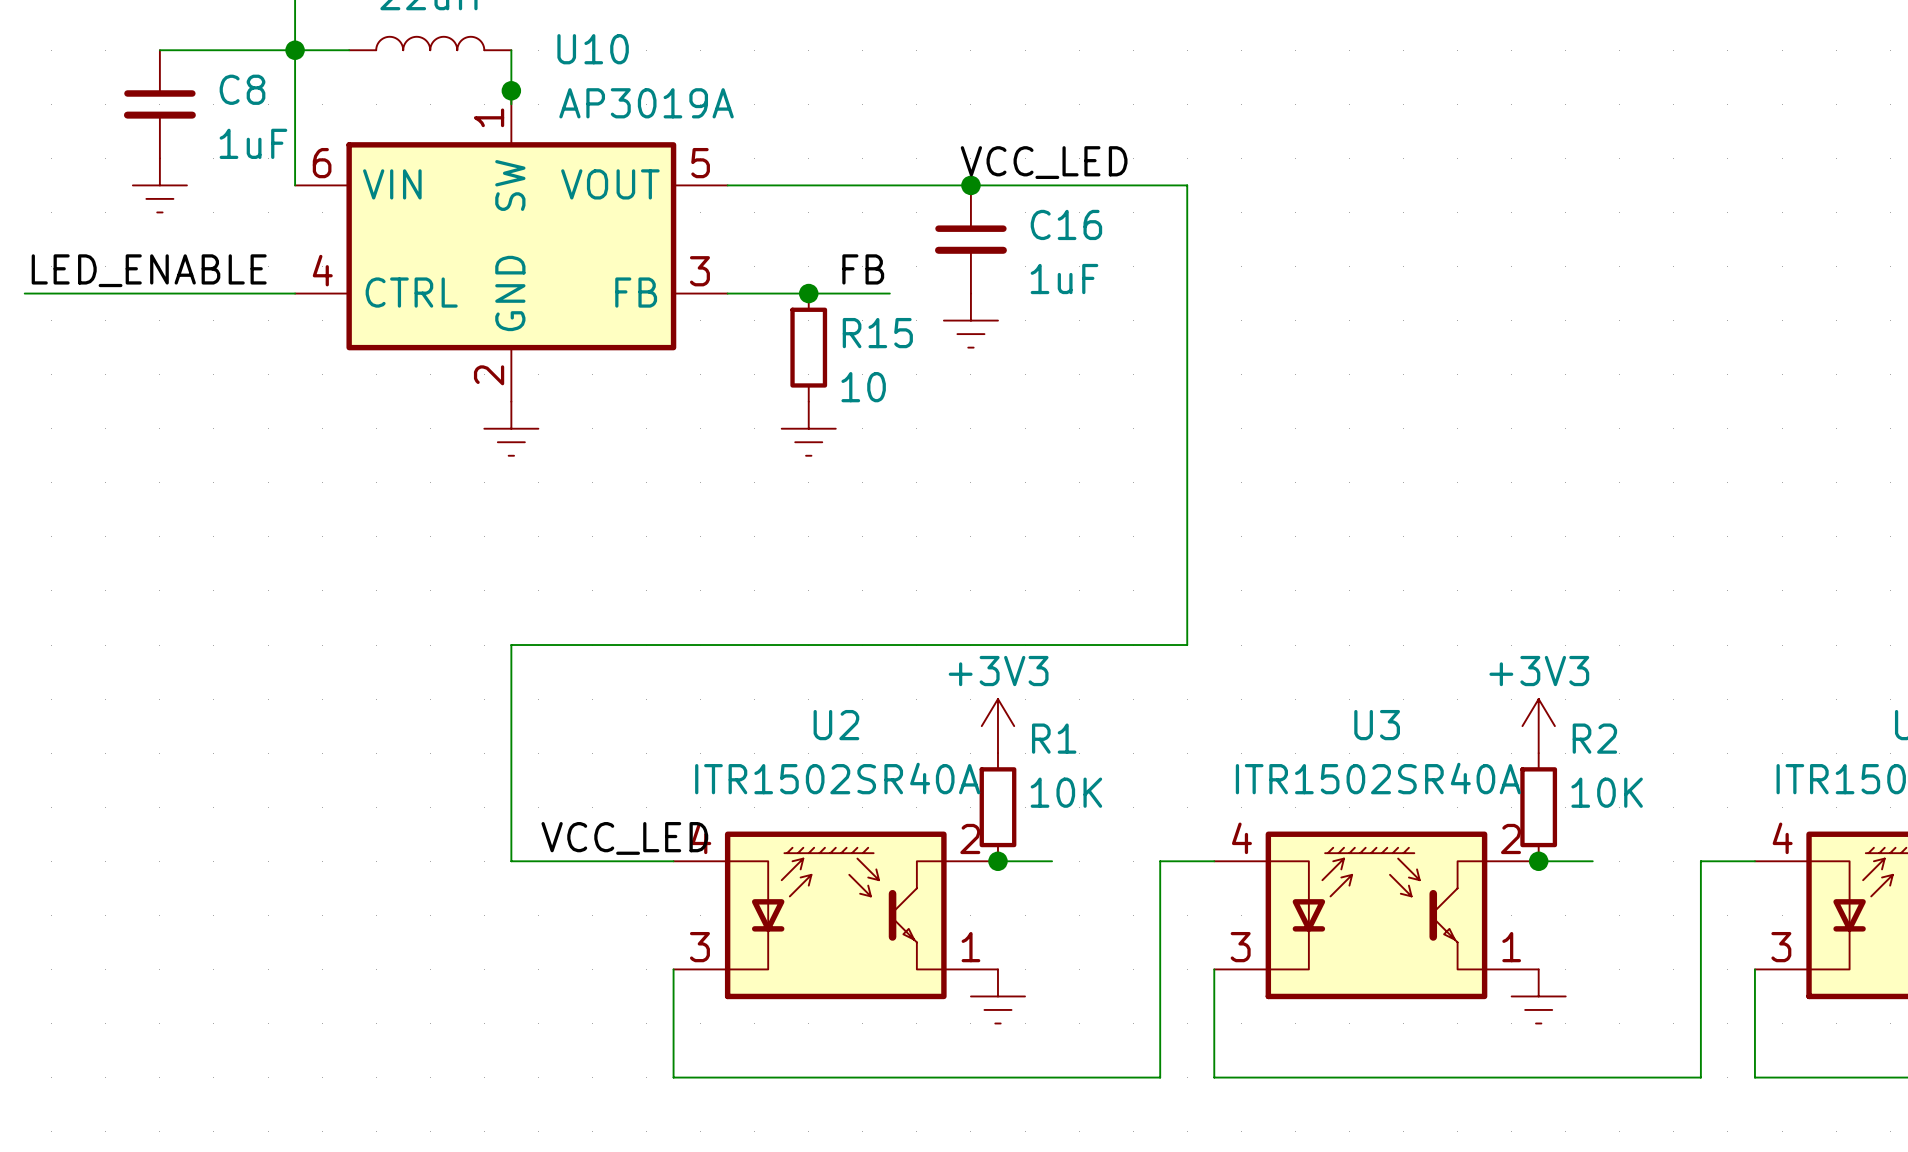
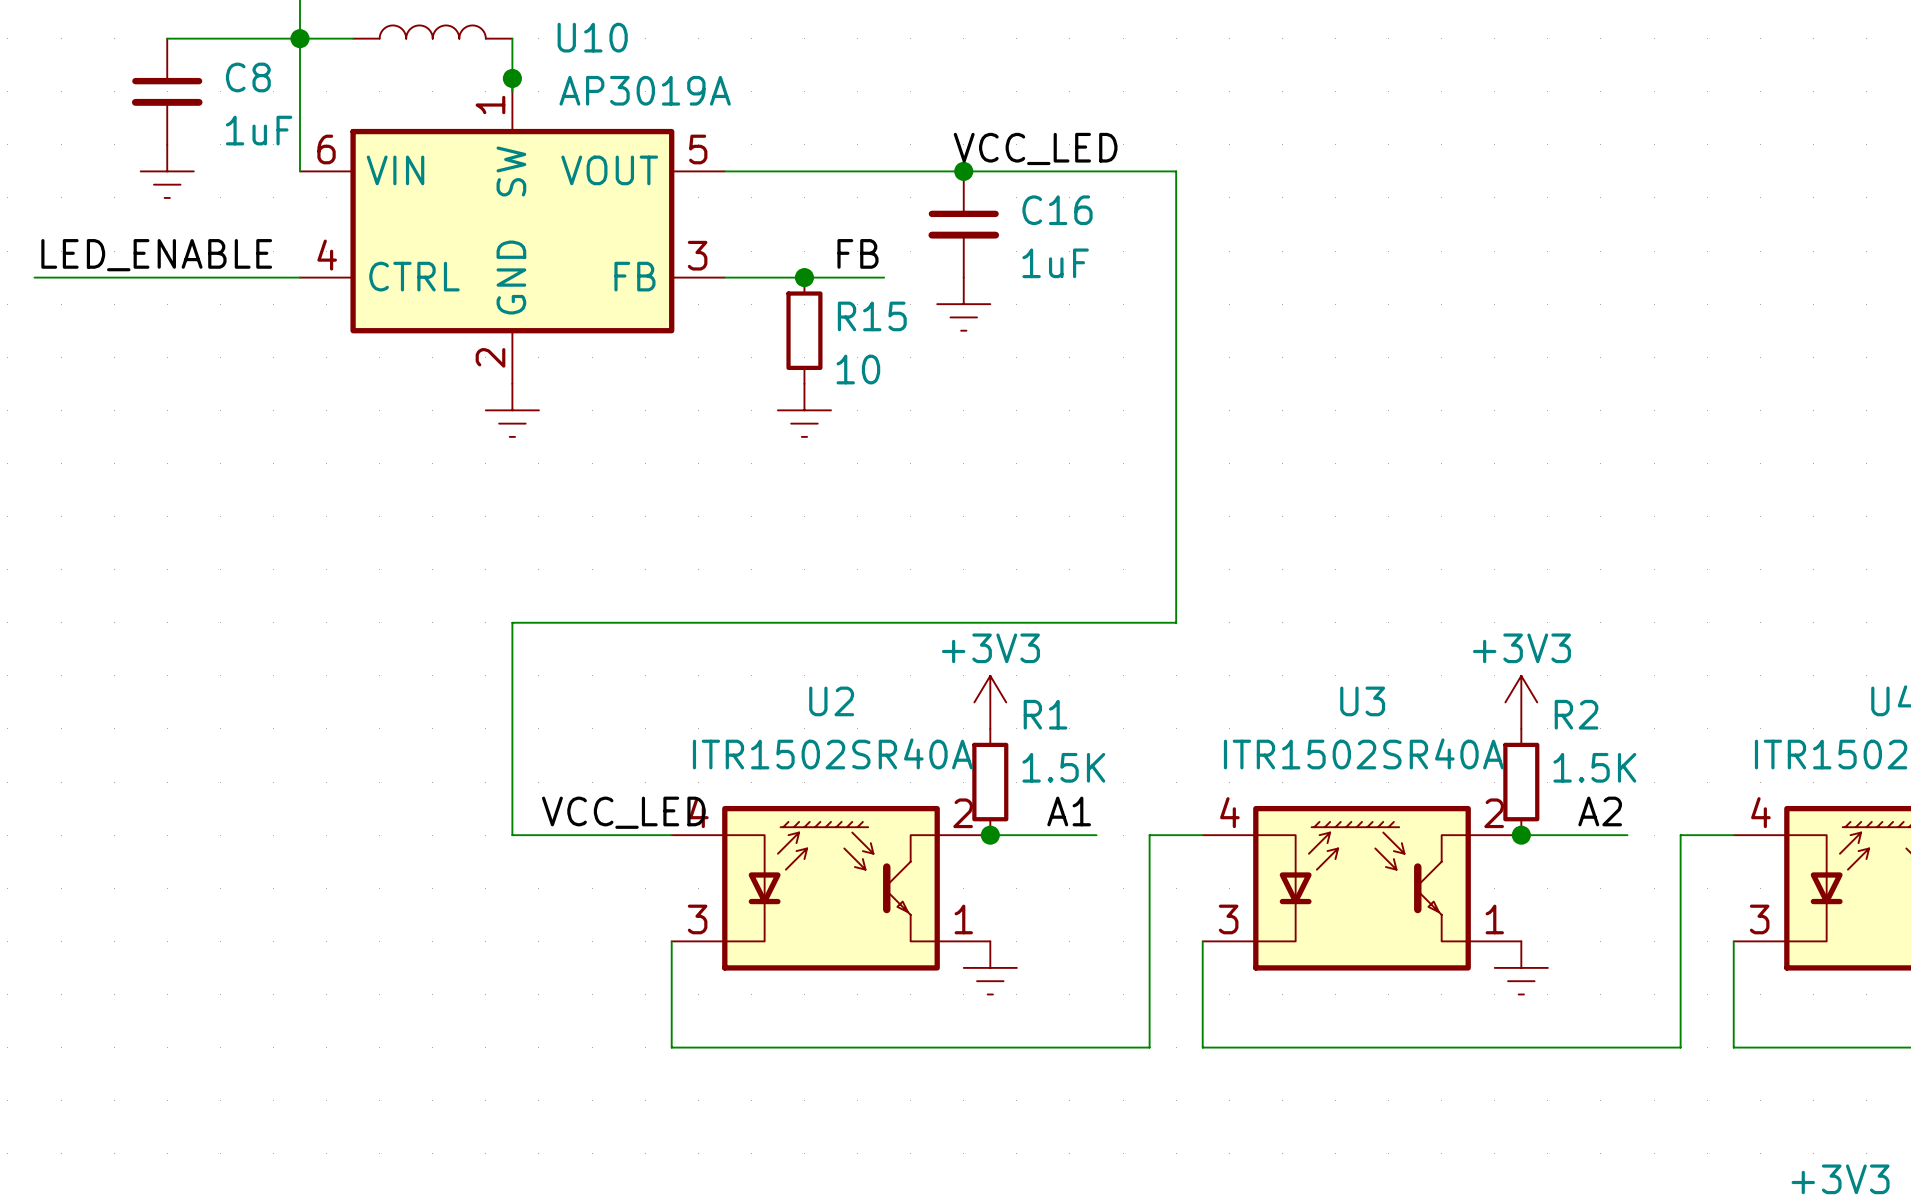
R1 value: 10K (1066, 792) -> 1.5K (1063, 767)
R2 value: 10K (1607, 792) -> 1.5K (1594, 767)
label: none -> A1 (1069, 811)
label: none -> A2 (1600, 811)
wire: none -> (1043, 835) (1096, 835)
wire: none -> (1574, 835) (1627, 835)

